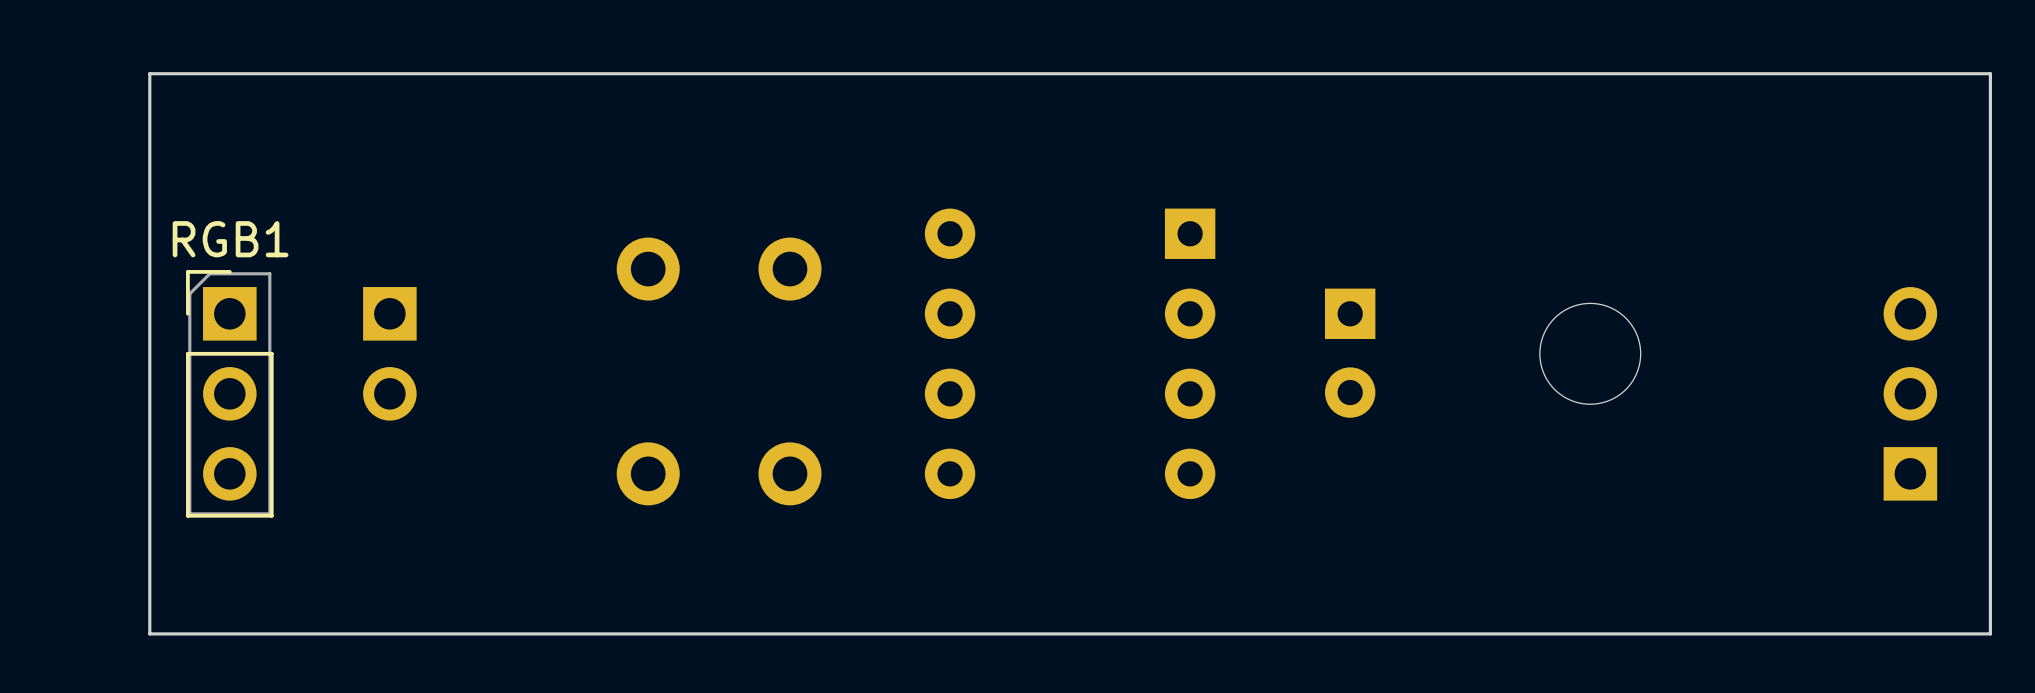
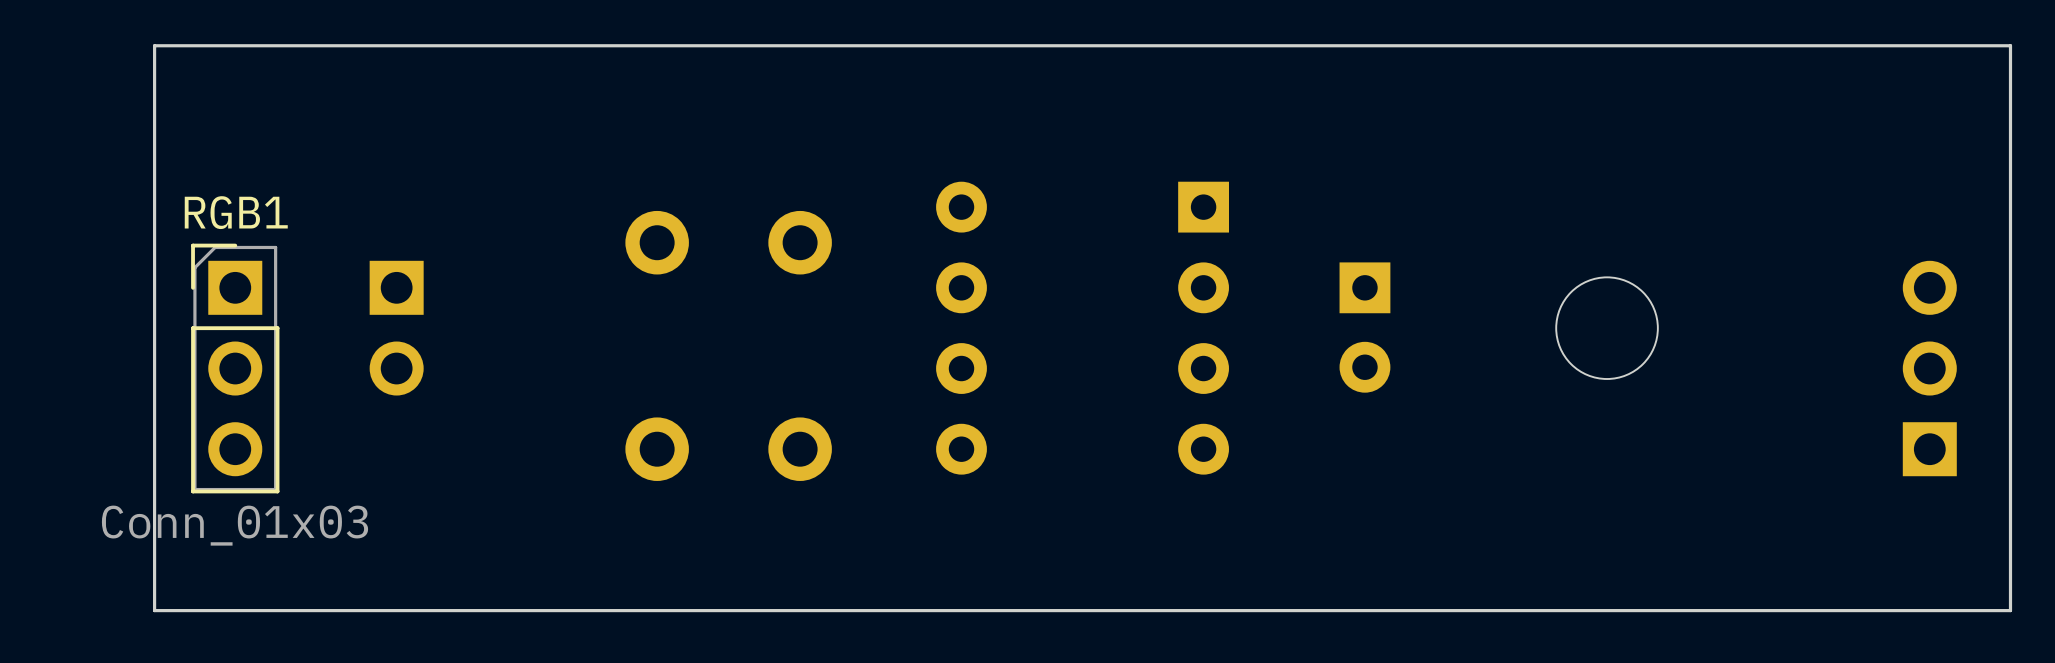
RGB1 value: none -> Conn_01x03 (235, 525)

